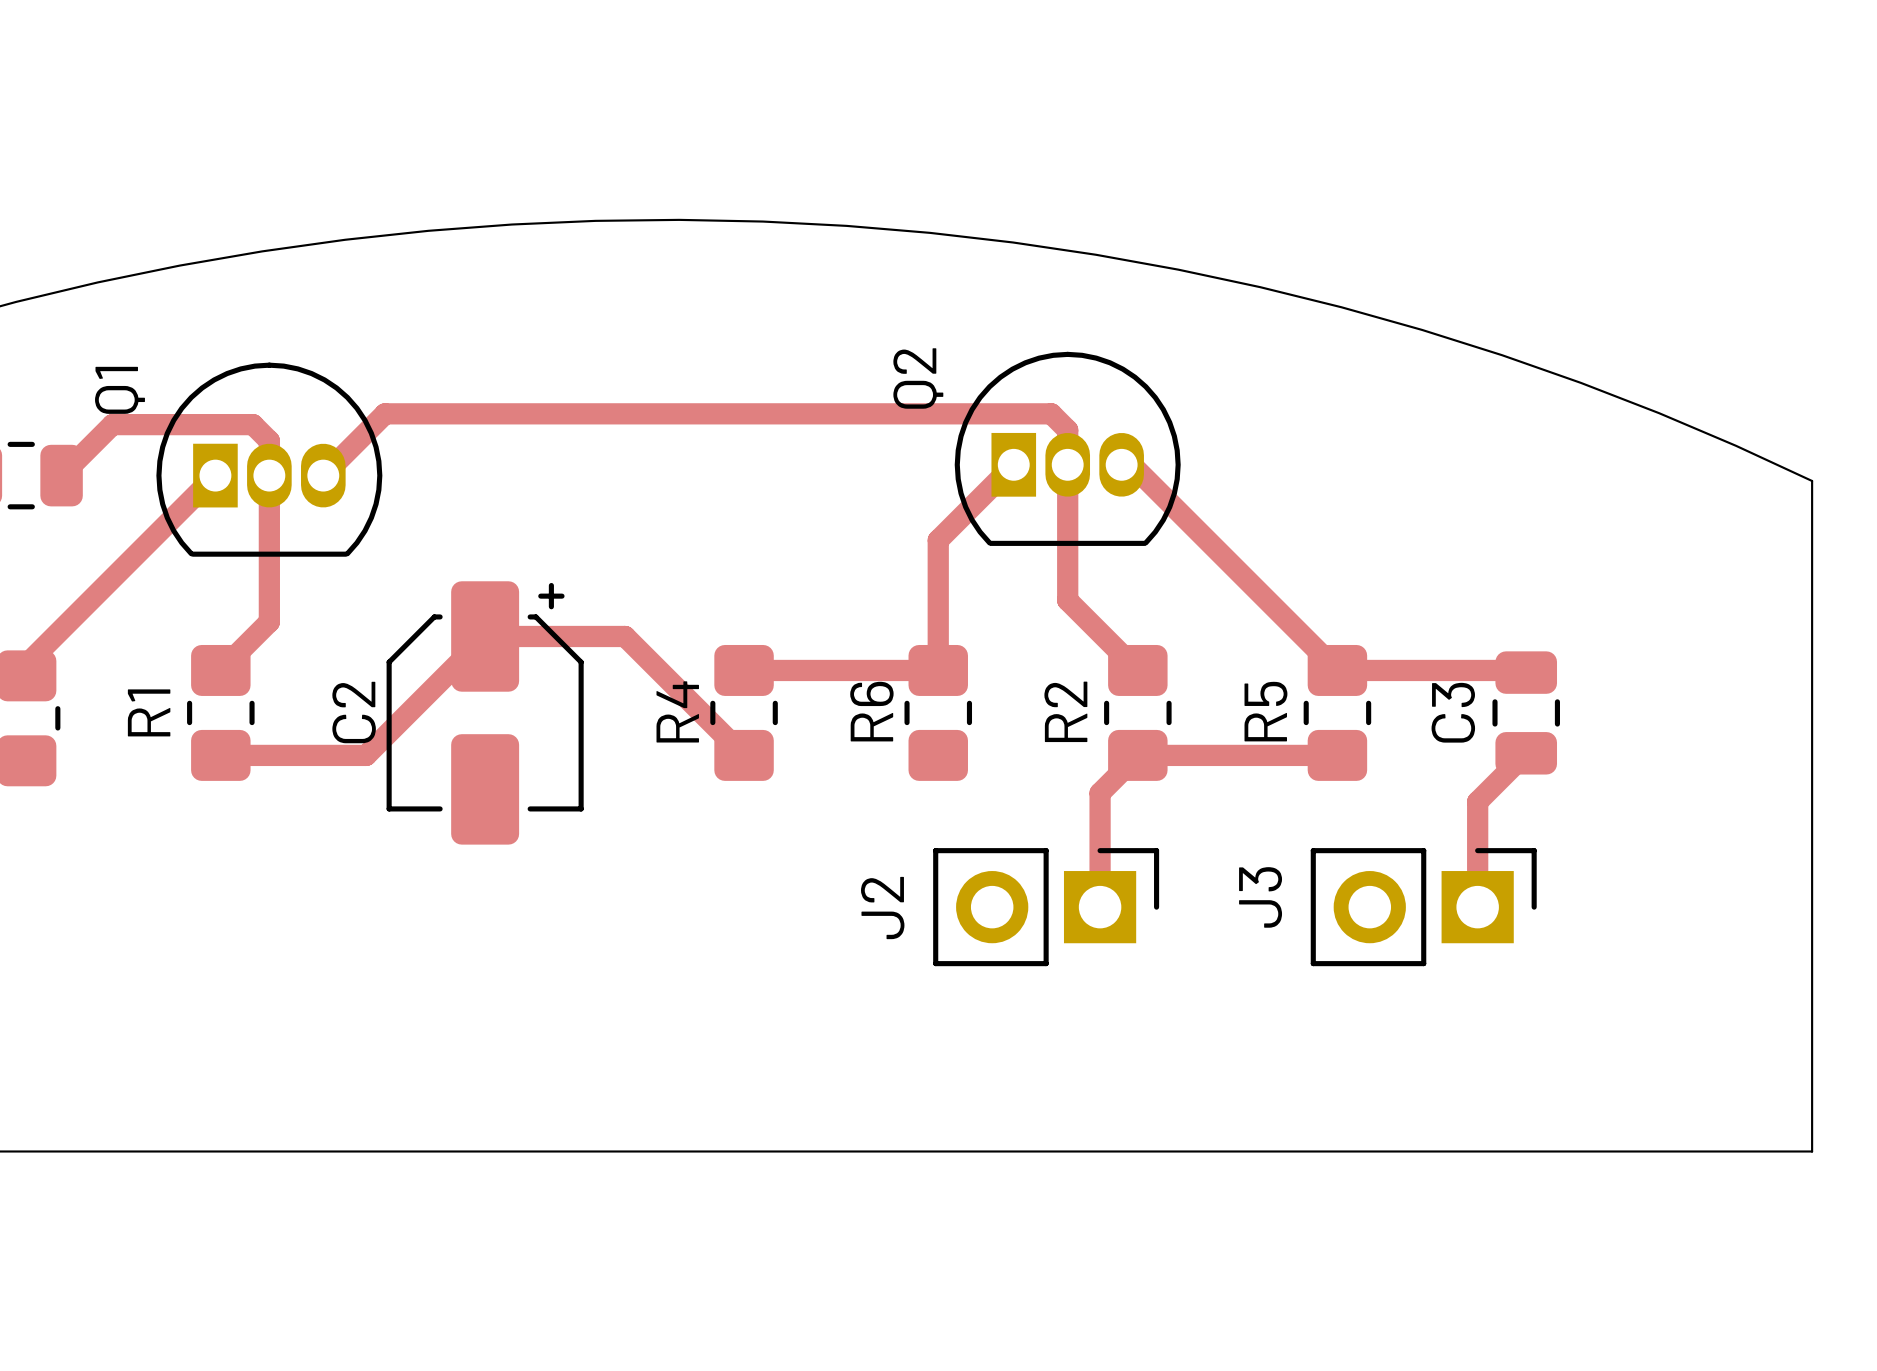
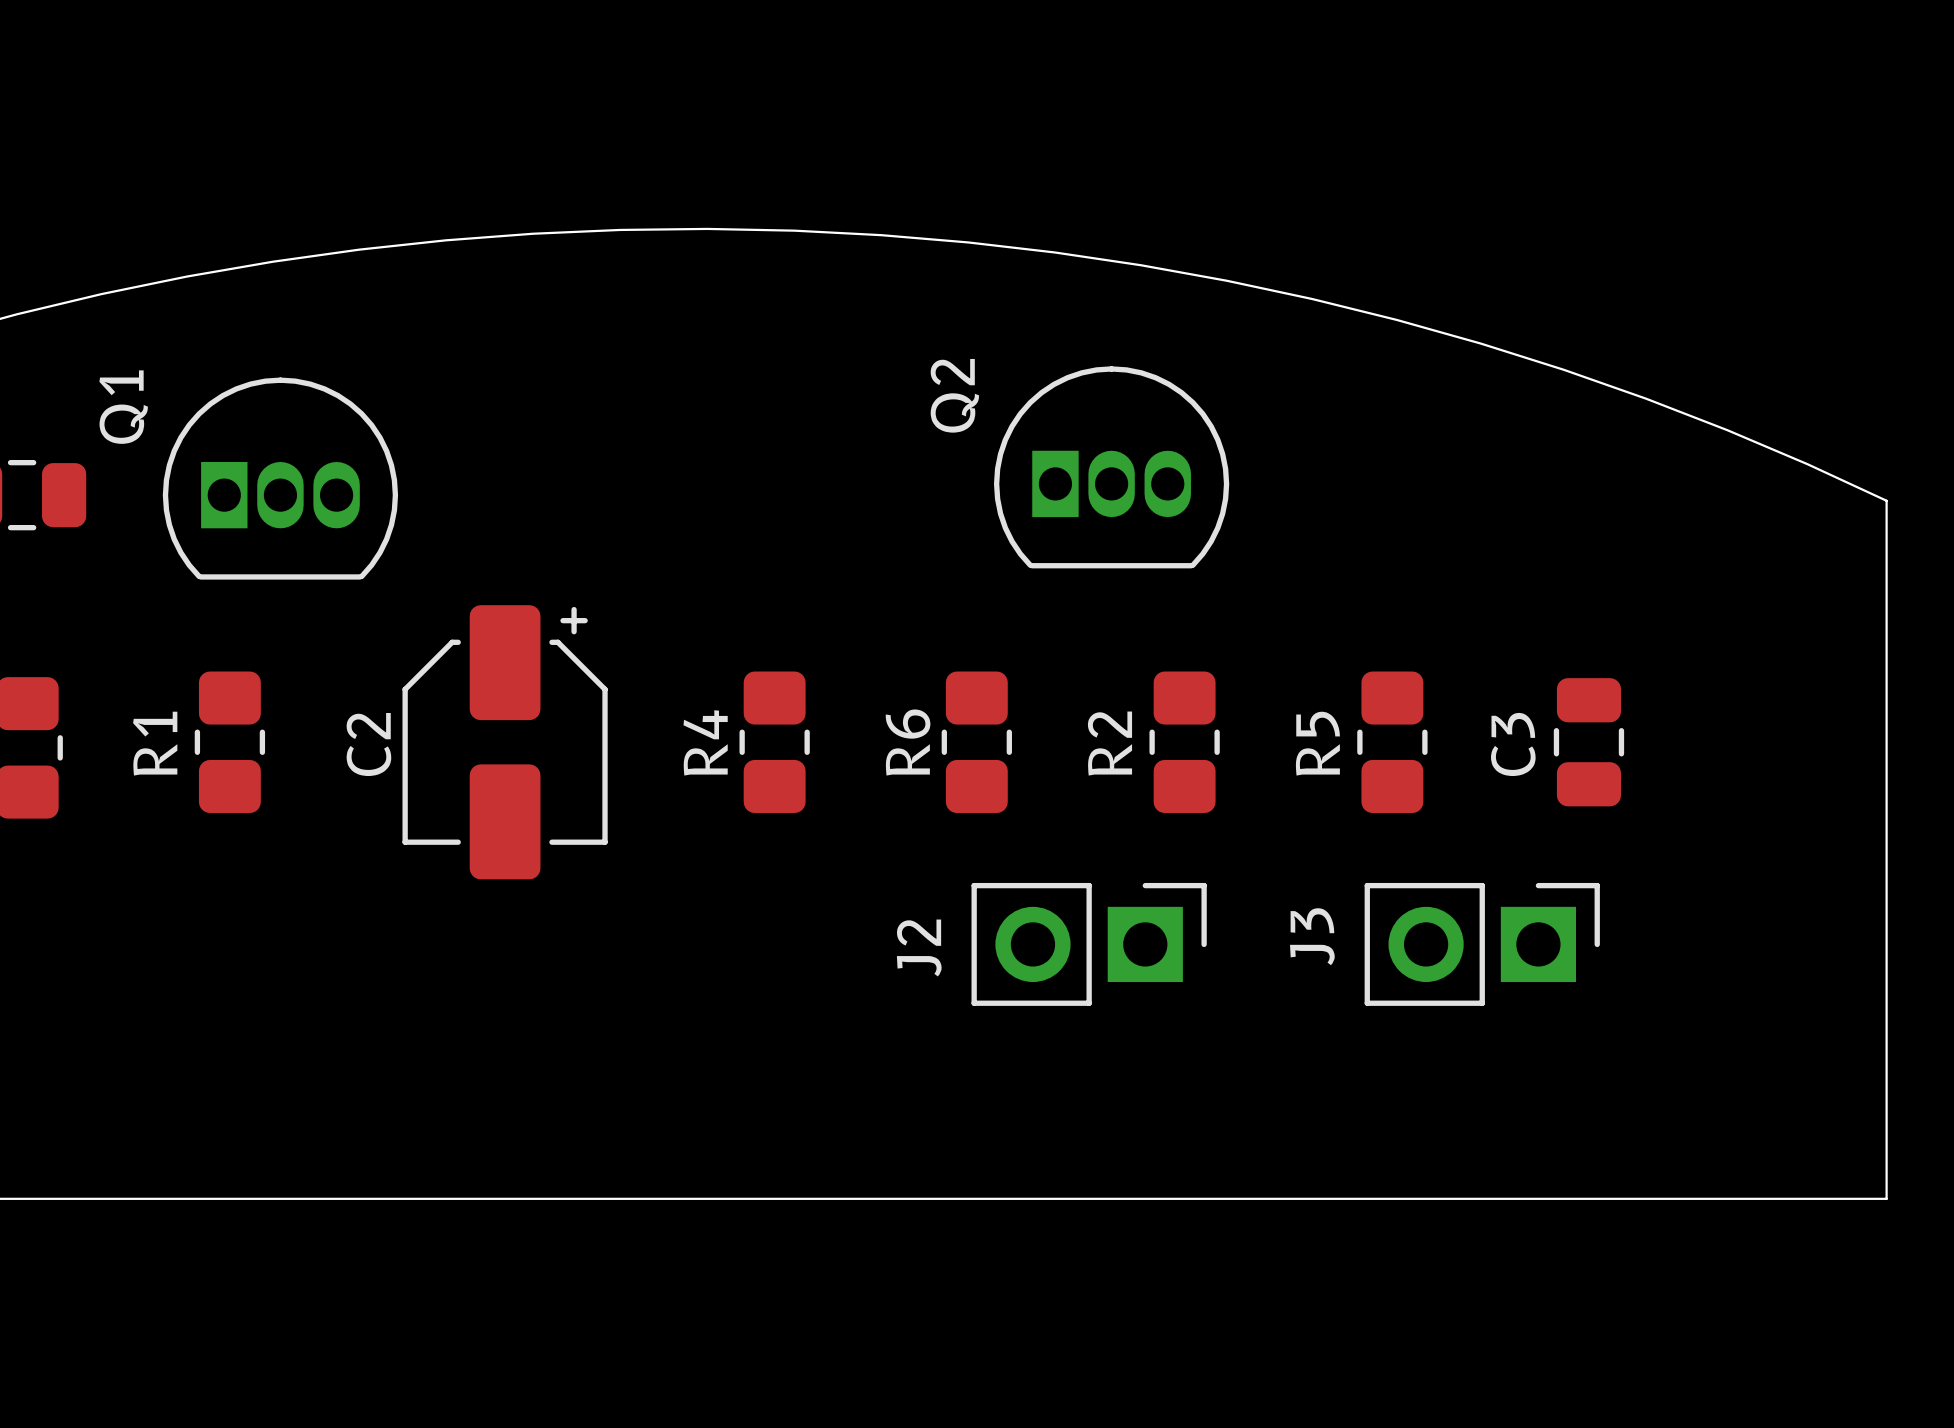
track: (1013, 464) (938, 540) (938, 670) (744, 670) -> none
track: (1121, 464) (1131, 464) (1337, 670) (1524, 670) (1526, 672) -> none
track: (61, 475) (112, 424) (253, 424) (269, 440) (269, 621) (220, 670) -> none
track: (215, 475) (26, 664) (26, 675) -> none
track: (323, 475) (385, 413) (1051, 413) (1067, 430) (1067, 600) (1137, 670) -> none
track: (1526, 753) (1477, 801) (1477, 907) -> none
track: (220, 755) (366, 755) (485, 636) (625, 636) (744, 755) -> none
track: (1337, 755) (1137, 755) (1100, 793) (1100, 907) -> none

